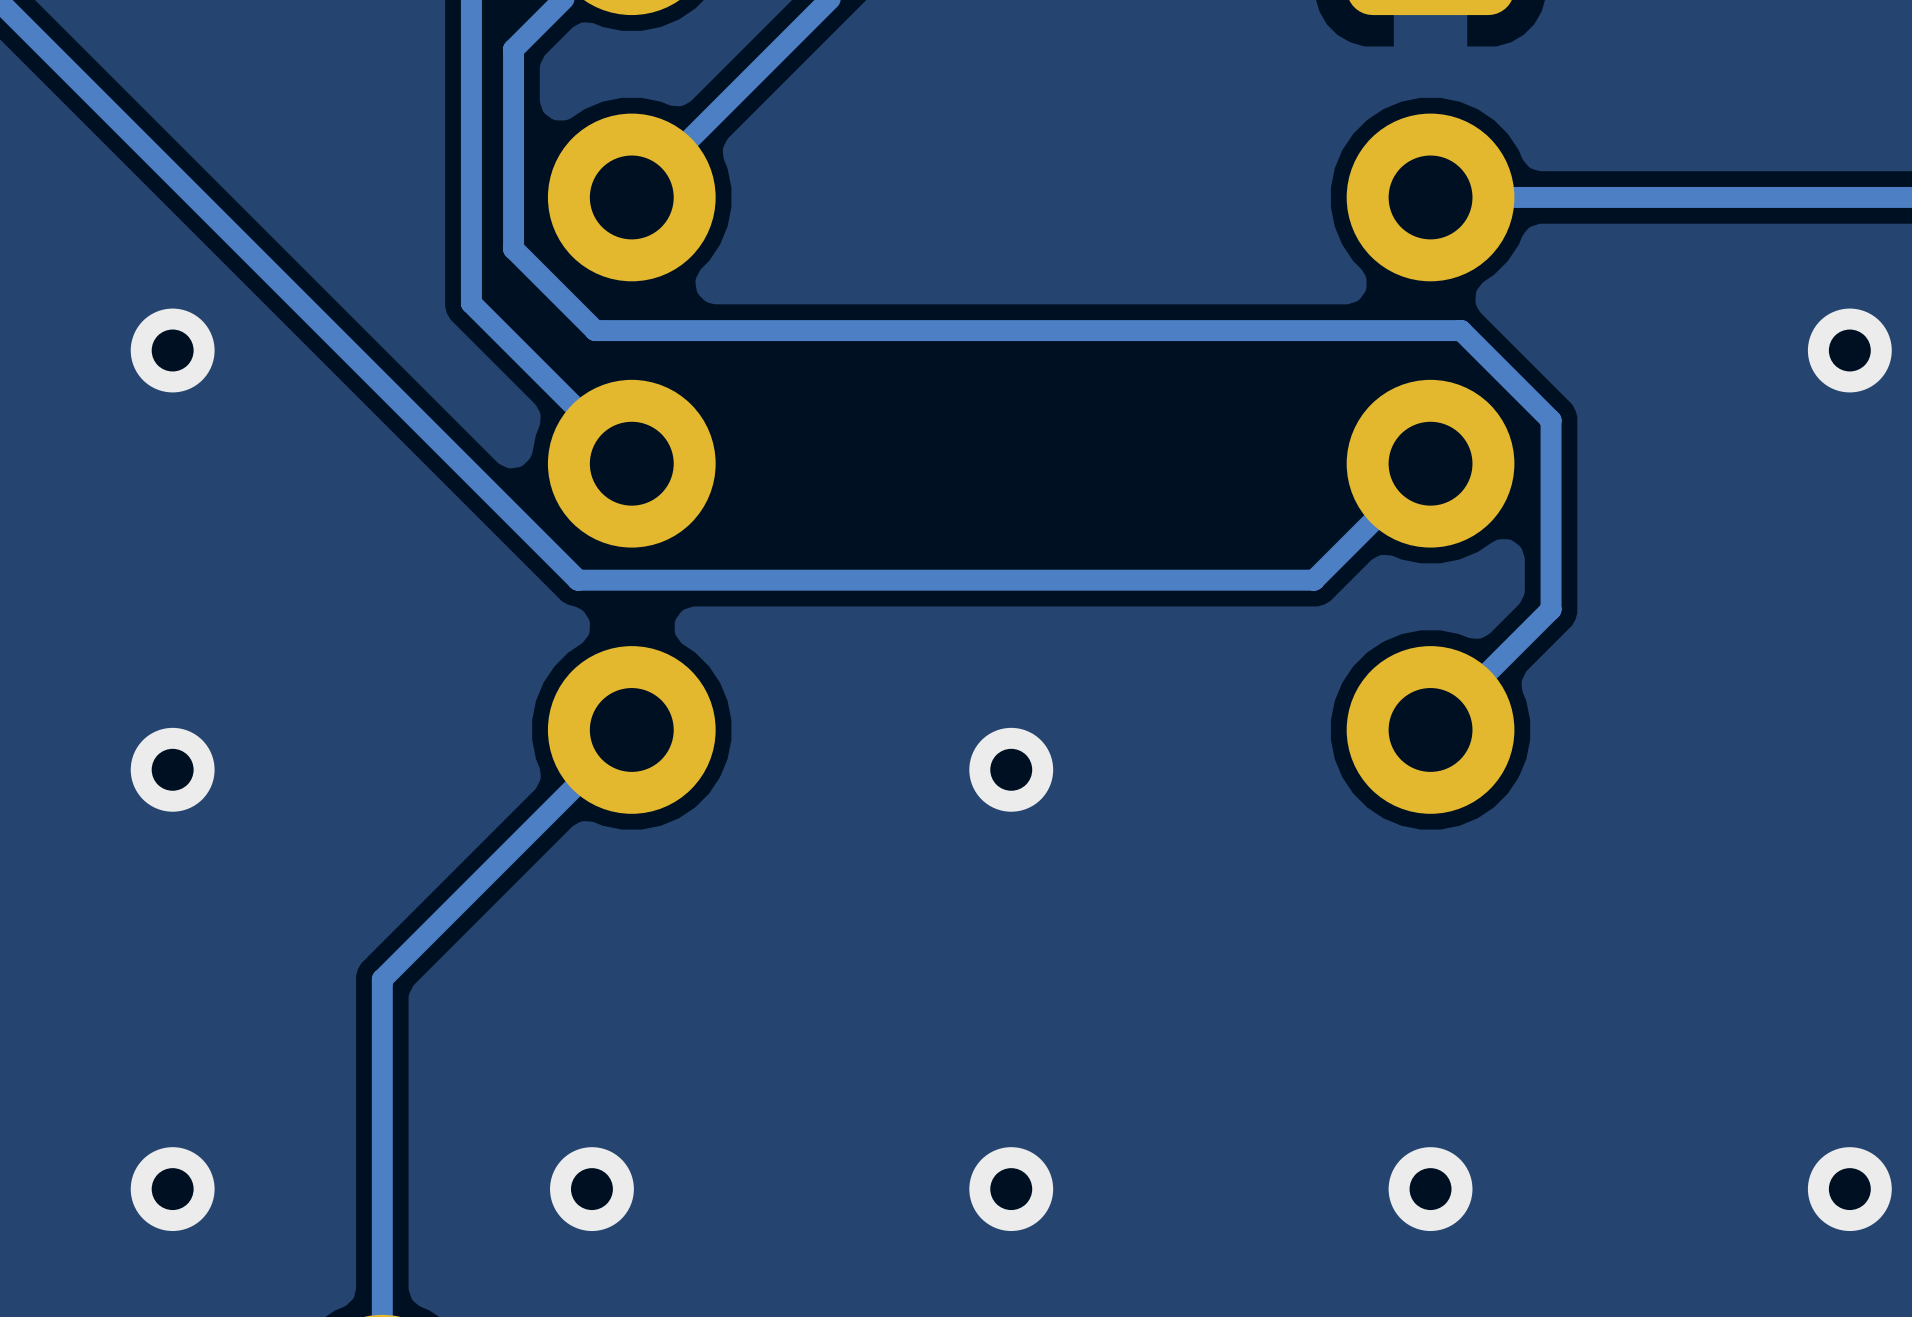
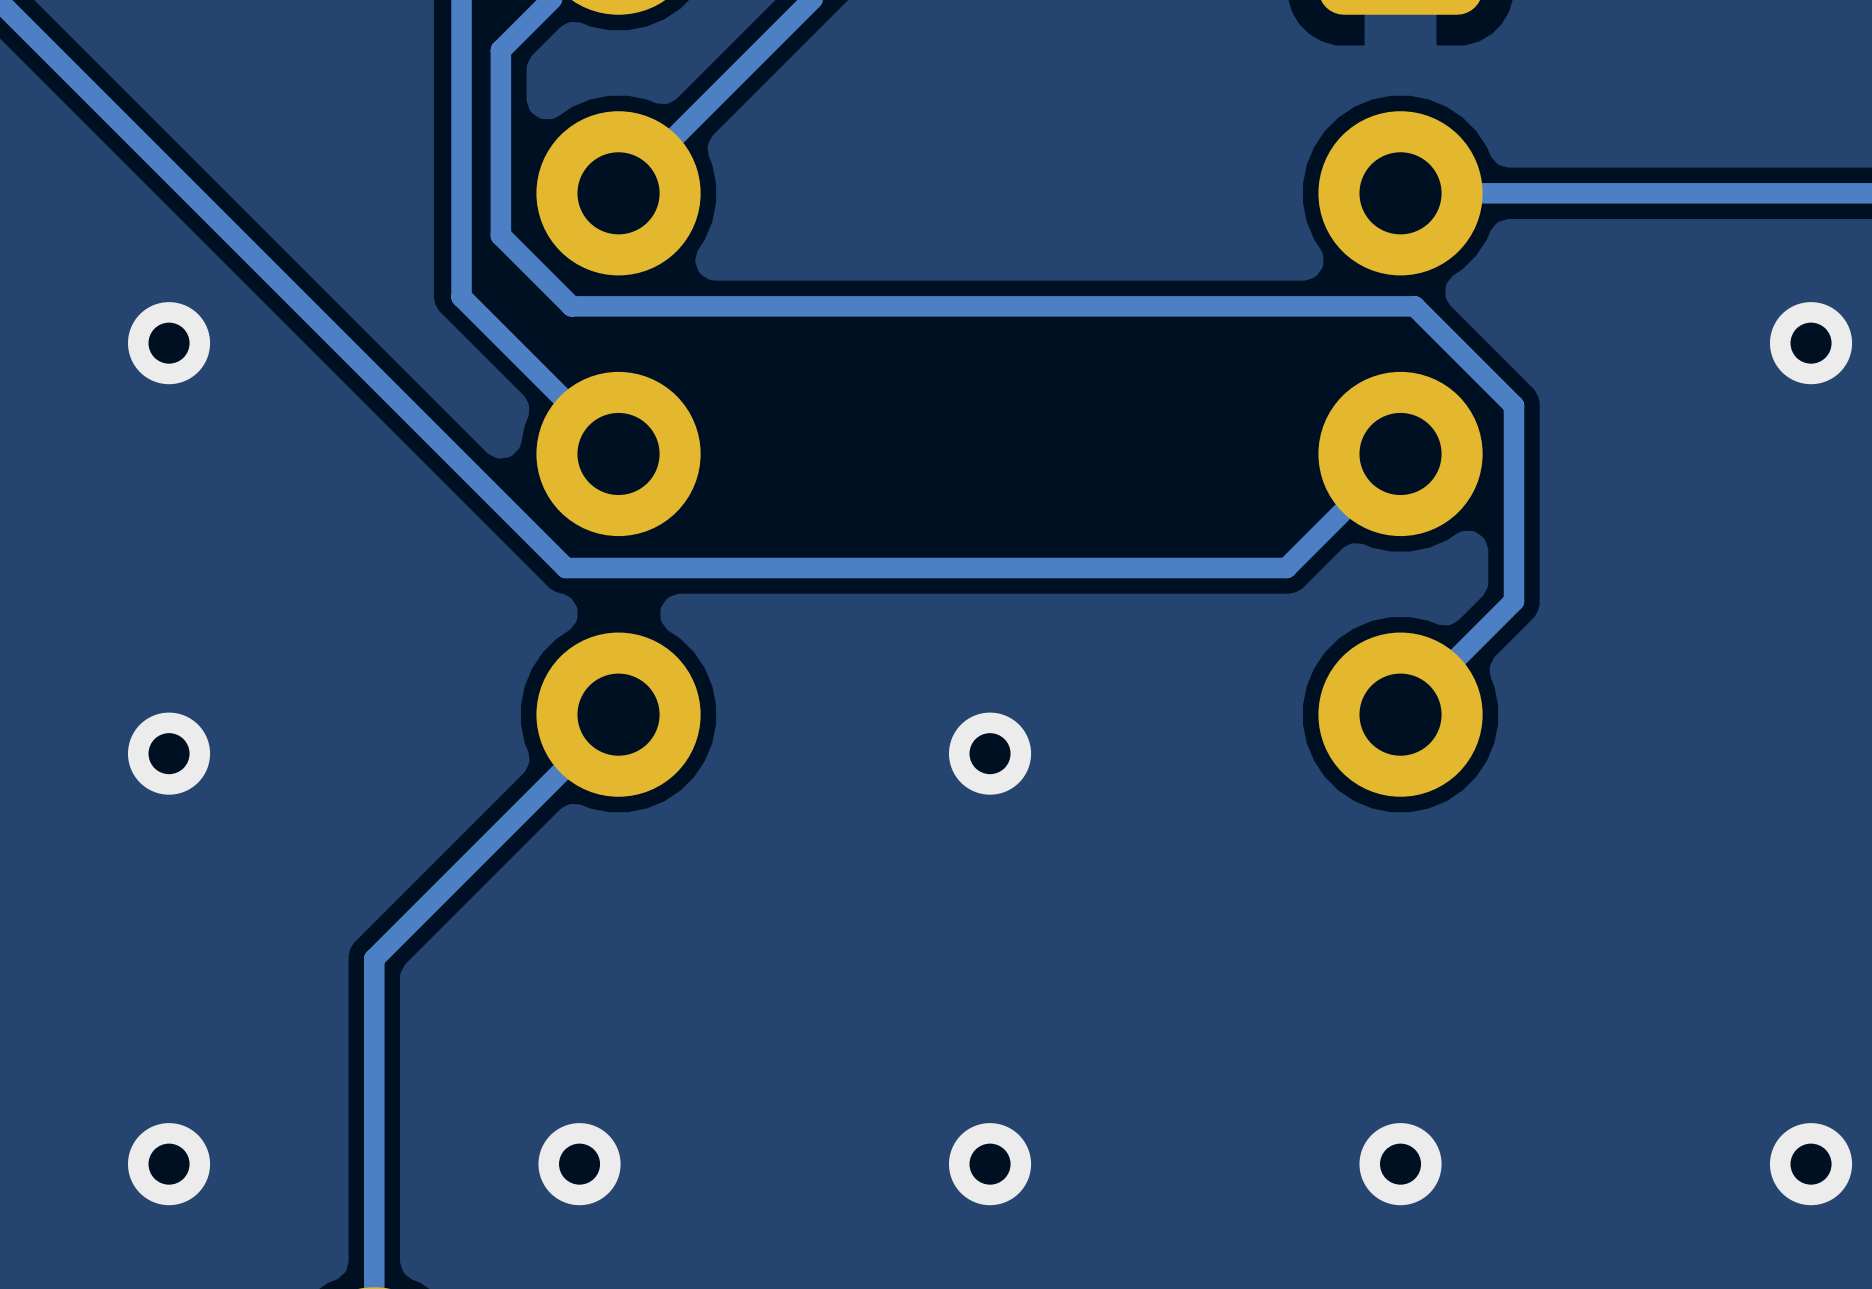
track: (513, 49) (513, 248) (595, 330) (1461, 330) (1551, 420) (1551, 609) (1546, 614) -> (502, 48) (500, 50) (500, 235) (571, 306) (1414, 306) (1513, 405) (1513, 601)

